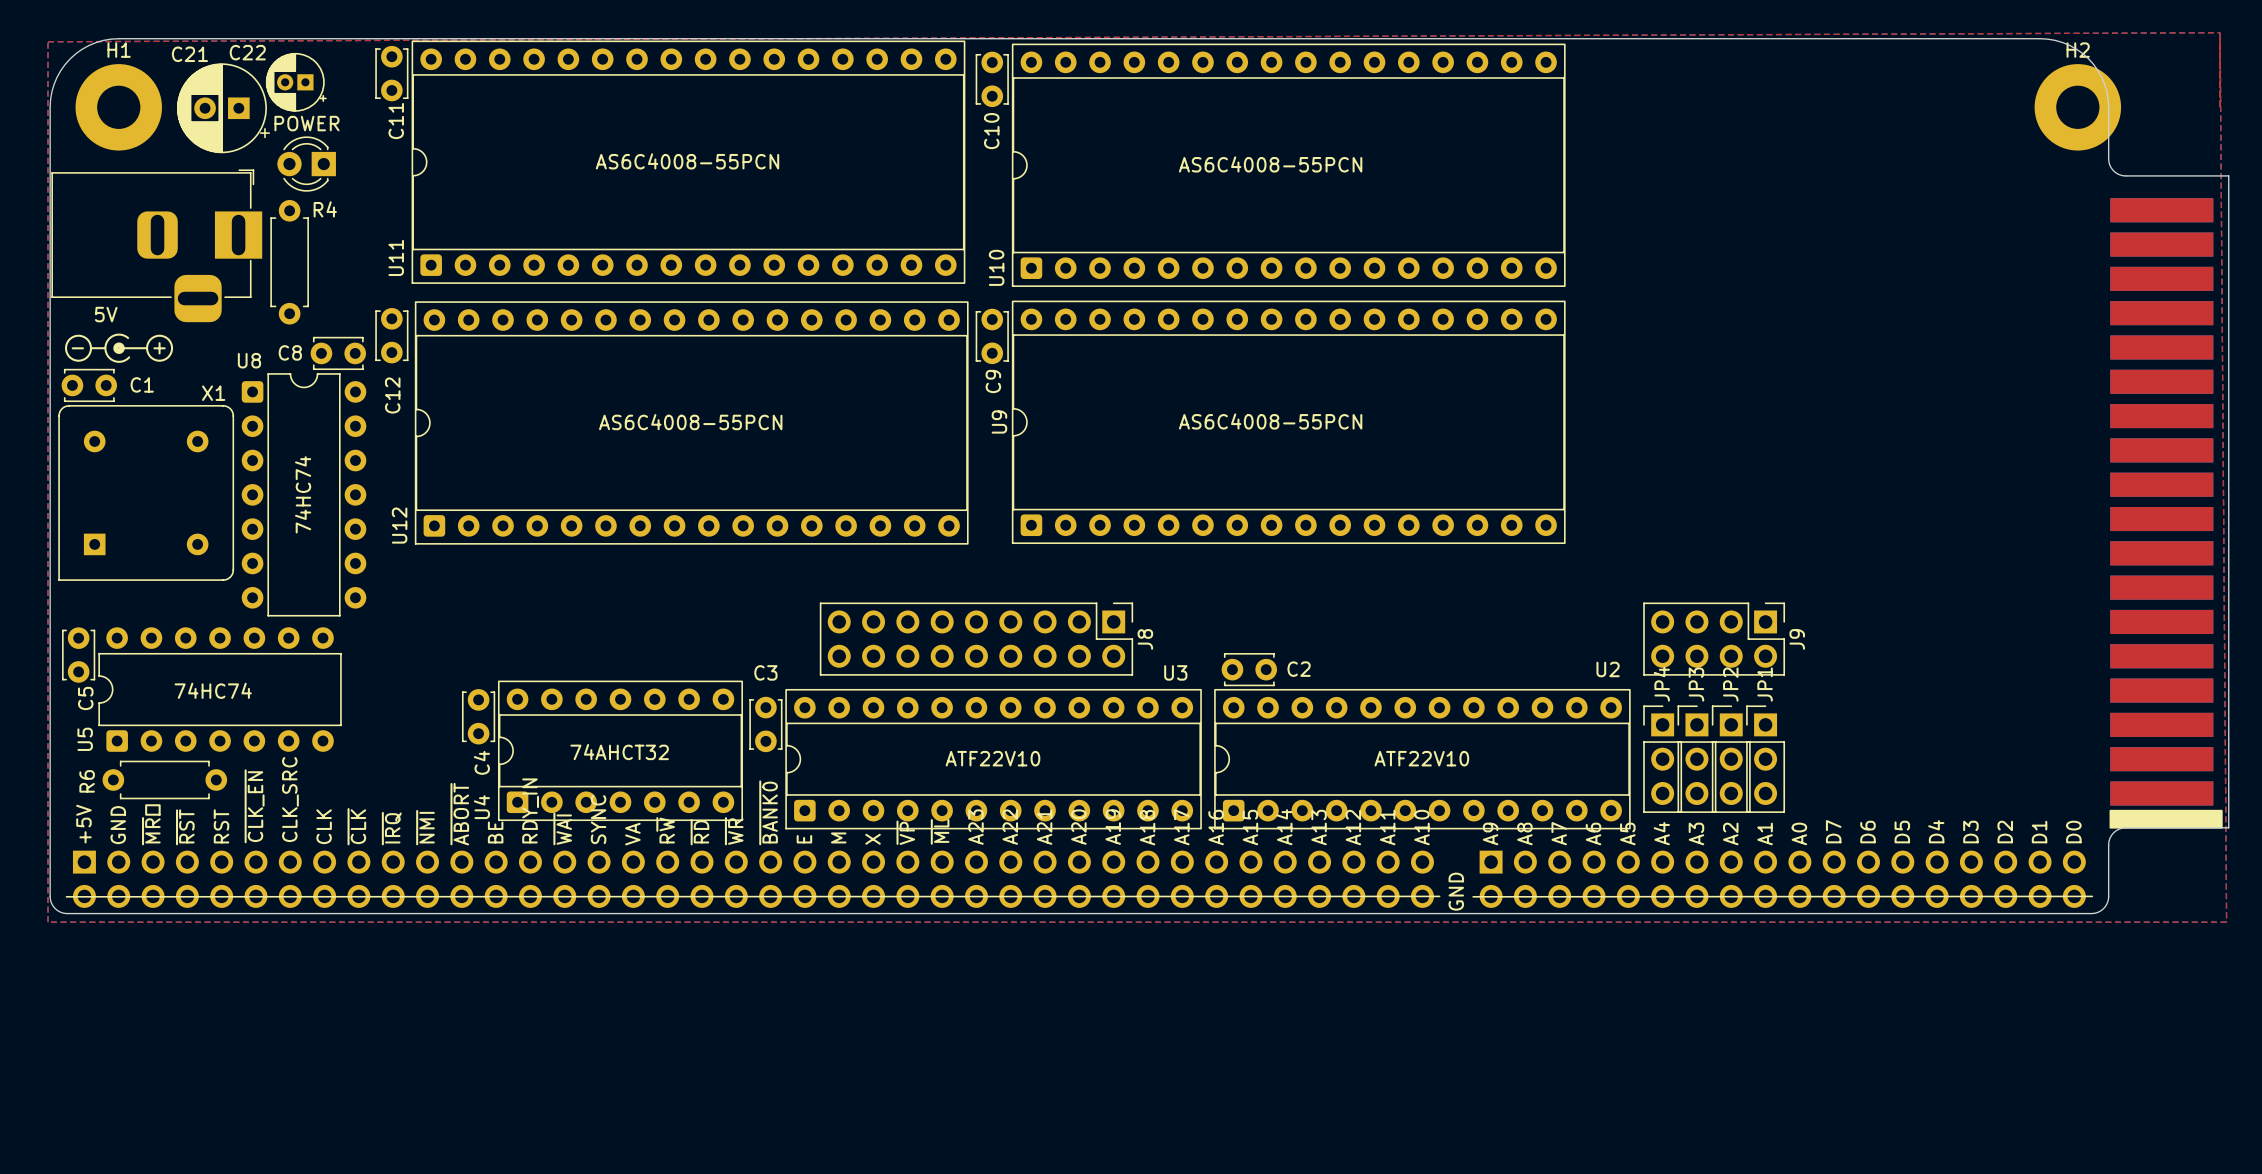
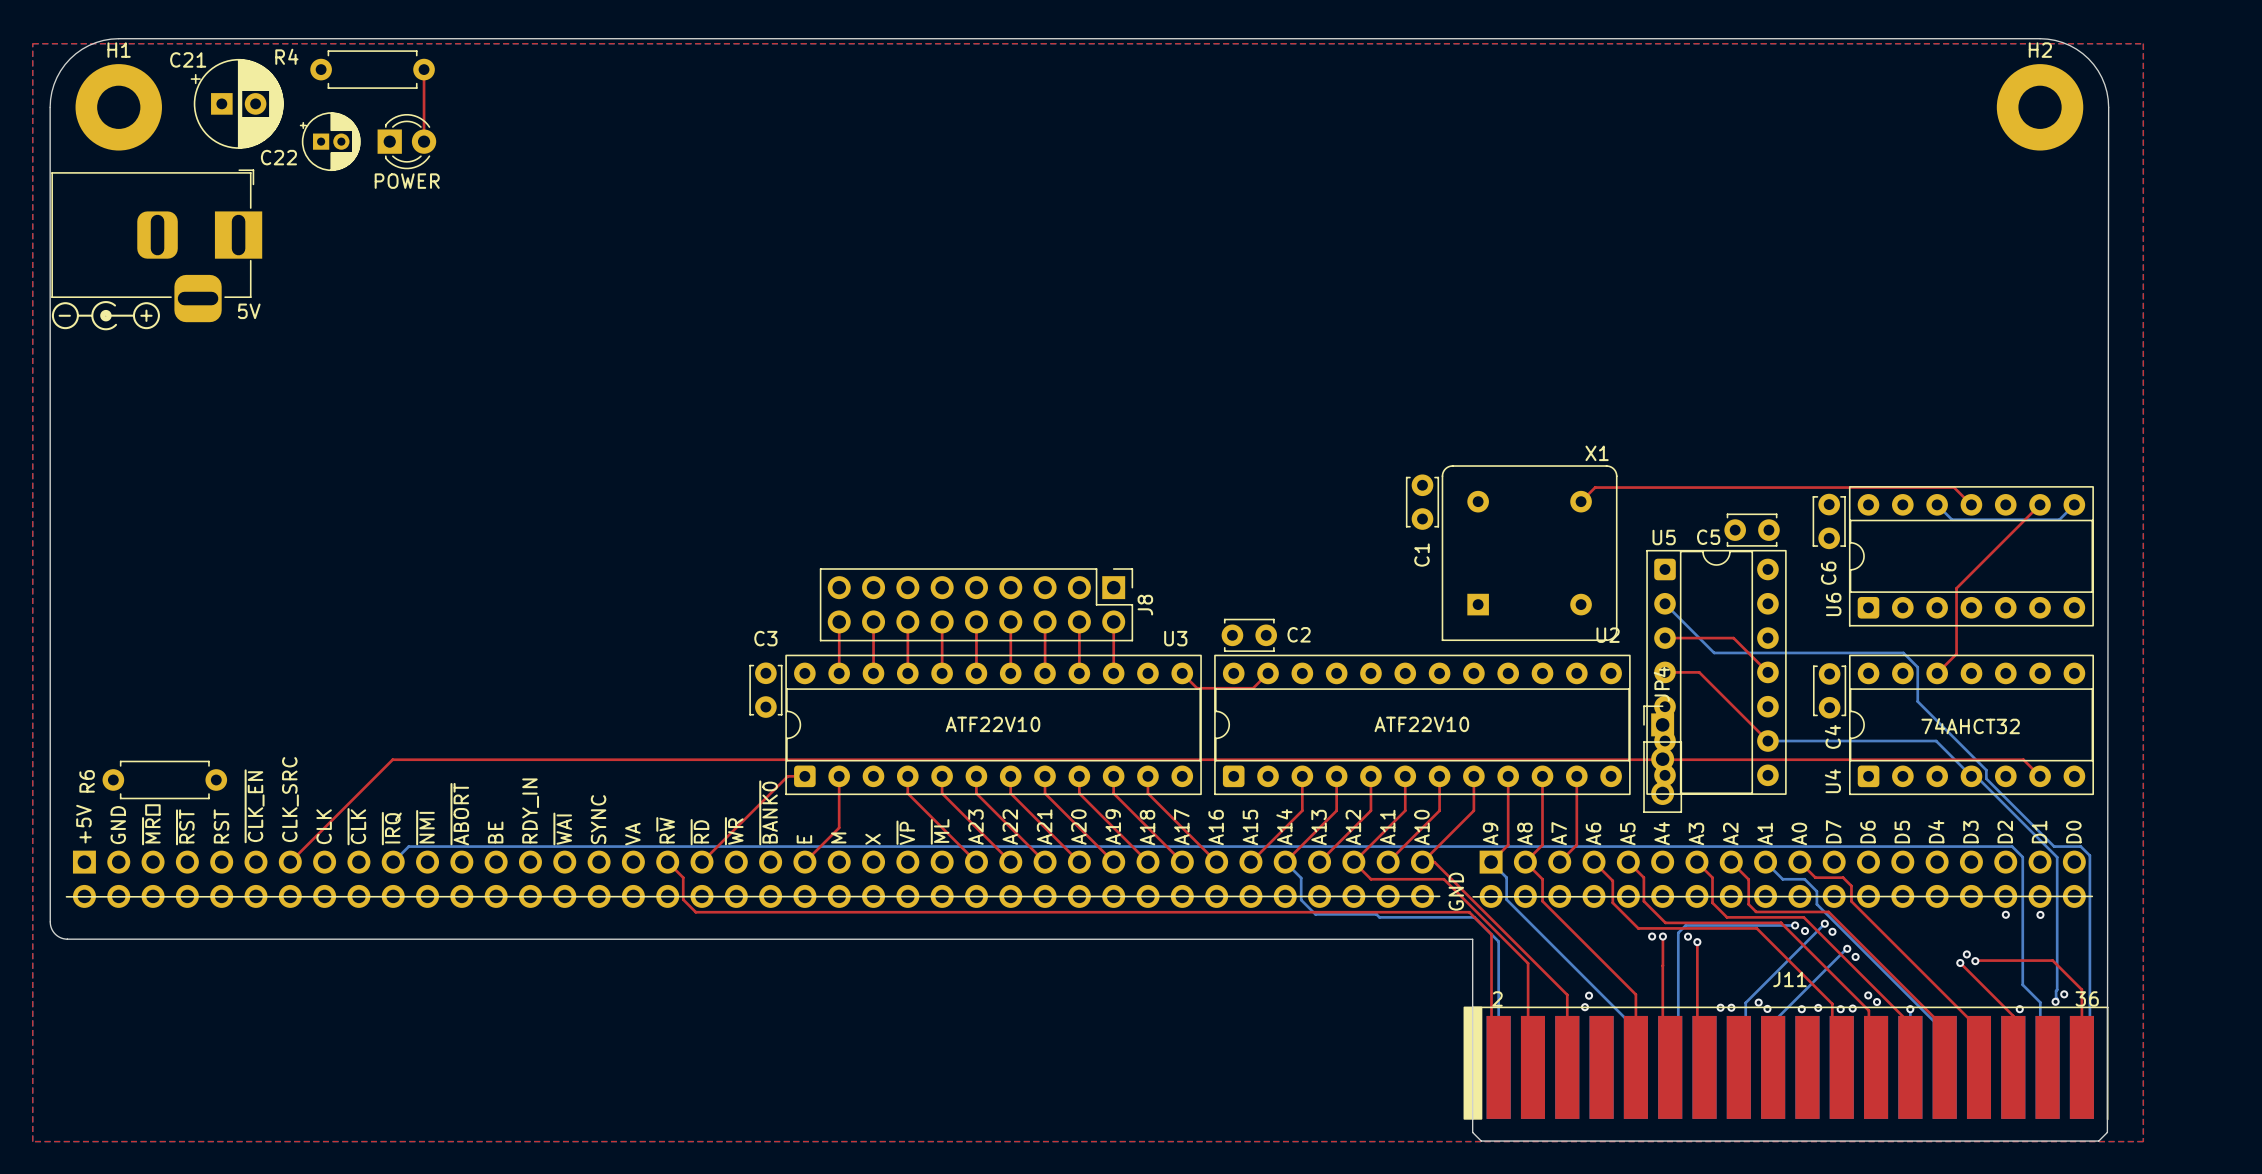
top zone outline: (2220, 32) (48, 41) (48, 922) (2226, 922) (2220, 32) -> (32, 43) (32, 1141) (2143, 1141) (2143, 43) (32, 43)
C22 name position: C22 (247, 52) -> C22 (278, 157)
top track: none -> (424, 69) (424, 141)
C11: (391, 73) -> none
C10: (992, 79) -> none
C22 rotation: 0° (296, 82) -> 180° (330, 141)
C22 position: (296, 82) -> (330, 141)
board edge: (50, 107) (50, 896) (55, 908) (67, 913) (2097, 912) (2103, 908) (2108, 900) (2108, 843) (2111, 835) (2116, 830) (2125, 827) (2228, 827) (2228, 175) (2125, 175) (2116, 173) (2111, 167) (2108, 160) (2108, 107) -> (50, 922) (55, 934) (67, 939) (1472, 939) (1472, 1132) (1481, 1141) (2098, 1141) (2107, 1132) (2108, 107)
board edge: none -> (50, 107) (50, 921)
H2 position: (2077, 107) -> (2040, 107)
C21 rotation: 0° (223, 108) -> 180° (237, 103)
U11: AS6C4008-55PCN (688, 162) -> none
part rotation: 0° (306, 164) -> 180° (406, 141)
part position: (306, 164) -> (406, 141)
U10: AS6C4008-55PCN (1288, 165) -> none
R4 name position: R4 (325, 209) -> R4 (286, 56)
R4 rotation: 0° (289, 262) -> 90° clockwise (372, 69)
R4 position: (289, 262) -> (372, 69)
text position: 5V (106, 314) -> 5V (249, 311)
C12: (391, 335) -> none
C9: (992, 336) -> none
text position: - (77, 348) -> - (64, 315)
drawing position: (119, 348) -> (105, 315)
text position: + (159, 348) -> + (146, 315)
C8: (338, 353) -> none
C1 rotation: 0° (89, 385) -> 90° clockwise (1422, 502)
C1 position: (89, 385) -> (1422, 502)
U12: AS6C4008-55PCN (691, 422) -> none
U9: AS6C4008-55PCN (1288, 422) -> none
X1 position: (146, 492) -> (1529, 553)
U8: 74HC74 (304, 494) -> none
top track: none -> (1581, 501) (1595, 487) (1954, 487) (1971, 504)
bottom track: none -> (1937, 504) (1951, 519) (2059, 519) (2074, 504)
top track: none -> (2040, 504) (1956, 588) (1956, 654) (1937, 673)
part: (2166, 513) -> none
C6: none -> (1829, 521)
U6: none -> (1971, 556)
bottom track: none -> (1665, 603) (1714, 652) (1903, 652) (1917, 667) (1917, 701) (1986, 770) (1986, 778) (2054, 846) (2080, 846) (2089, 855) (2089, 1059) (2081, 1067)
top track: none -> (839, 621) (839, 673)
top track: none -> (873, 621) (873, 673)
top track: none -> (907, 621) (907, 673)
top track: none -> (942, 621) (942, 673)
top track: none -> (976, 621) (976, 673)
top track: none -> (1010, 621) (1010, 673)
top track: none -> (1045, 621) (1045, 673)
top track: none -> (1079, 621) (1079, 673)
top track: none -> (1113, 621) (1113, 673)
U5 footprint: [98, 627, 342, 752] -> [1646, 549, 1787, 795]
top track: none -> (1665, 638) (1733, 638) (1767, 672)
J8 position: (976, 639) -> (976, 604)
J9: (1714, 639) -> none
C5 rotation: 0° (78, 655) -> 90° clockwise (1752, 530)
C5 position: (78, 655) -> (1752, 530)
C2 position: (1249, 669) -> (1249, 635)
top track: none -> (1665, 672) (1699, 672) (1767, 741)
top track: none -> (1182, 673) (1197, 688) (1253, 688) (1268, 673)
U5 value: 74HC74 (213, 690) -> none
C4 position: (478, 716) -> (1829, 690)
C3 position: (765, 724) -> (765, 690)
U5 name position: U5 (85, 739) -> U5 (1664, 537)
bottom track: none -> (1767, 741) (1936, 741) (1971, 776) (1976, 776) (2057, 857) (2057, 1000) (2055, 1001)
U4 position: (620, 750) -> (1971, 724)
U3 position: (993, 759) -> (993, 724)
U2 position: (1422, 759) -> (1422, 724)
JP3: (1696, 759) -> none
JP2: (1731, 759) -> none
JP1: (1765, 759) -> none
top track: none -> (804, 776) (787, 776) (702, 862)
top track: none -> (839, 776) (839, 827) (804, 862)
top track: none -> (907, 776) (907, 793) (976, 862)
top track: none -> (942, 776) (942, 793) (1010, 862)
top track: none -> (976, 776) (976, 793) (1045, 862)
top track: none -> (1010, 776) (1010, 793) (1079, 862)
top track: none -> (1045, 776) (1045, 793) (1113, 862)
top track: none -> (1079, 776) (1079, 793) (1148, 862)
top track: none -> (1113, 776) (1113, 793) (1182, 862)
top track: none -> (1147, 776) (1147, 793) (1216, 862)
top track: none -> (1302, 776) (1302, 810) (1250, 862)
top track: none -> (1336, 776) (1336, 810) (1285, 862)
top track: none -> (1370, 776) (1370, 810) (1319, 862)
top track: none -> (1405, 776) (1405, 810) (1353, 862) (1371, 879) (1444, 879) (1528, 963) (1528, 1062) (1532, 1067)
top track: none -> (1439, 776) (1439, 810) (1388, 862)
top track: none -> (1473, 776) (1473, 810) (1422, 862) (1434, 862) (1567, 994) (1567, 1067)
top track: none -> (1508, 776) (1508, 845) (1491, 862)
top track: none -> (1542, 776) (1542, 845) (1525, 862) (1542, 879) (1542, 901) (1635, 994) (1635, 1067)
top track: none -> (1576, 776) (1576, 845) (1559, 862)
top track: none -> (2040, 776) (2023, 759) (392, 759) (290, 862)
bottom track: none -> (393, 862) (408, 846) (2012, 846) (2022, 857) (2022, 984) (2040, 1002) (2040, 1060) (2047, 1067)
top track: none -> (667, 862) (683, 877) (683, 899) (695, 912) (1469, 912) (1491, 934) (1491, 1060) (1498, 1067)
bottom track: none -> (1285, 862) (1301, 878) (1301, 900) (1315, 914) (1376, 914) (1379, 917) (1474, 917) (1498, 941) (1498, 1067)
bottom track: none -> (1491, 862) (1506, 877) (1506, 899) (1635, 1028) (1635, 1067)
top track: none -> (1594, 862) (1612, 880) (1612, 902) (1638, 928) (1756, 928) (1832, 1003) (1832, 1057) (1841, 1067)
top track: none -> (1628, 862) (1643, 877) (1643, 901) (1665, 922) (1781, 922) (1868, 1010) (1868, 1060) (1876, 1067)
top track: none -> (1696, 862) (1712, 877) (1712, 902) (1727, 917) (1803, 917) (1910, 1023) (1910, 1067)
top track: none -> (1731, 862) (1748, 879) (1748, 904) (1755, 911)
bottom track: none -> (1765, 862) (1782, 879) (1804, 879) (1816, 891) (1816, 904) (1944, 1032) (1944, 1067)
top track: none -> (1799, 862) (1815, 877) (1843, 877) (1851, 886) (1851, 901) (1978, 1028) (1978, 1067)
top track: none -> (1755, 911) (1828, 911) (1944, 1027) (1944, 1067)
via: none -> (2005, 914)
via: none -> (2040, 914)
bottom track: none -> (1824, 923) (1745, 1002) (1745, 1060) (1738, 1067)
via: none -> (1824, 923)
bottom track: none -> (1795, 925) (1685, 925) (1678, 932) (1678, 1059) (1670, 1067)
via: none -> (1795, 925)
via: none -> (1805, 930)
via: none -> (1832, 931)
via: none -> (1652, 936)
top track: none -> (1662, 936) (1662, 965)
via: none -> (1662, 936)
via: none -> (1688, 936)
top track: none -> (1697, 942) (1697, 1060) (1704, 1067)
via: none -> (1697, 942)
via: none -> (1847, 948)
bottom track: none -> (1846, 949) (1773, 1022) (1773, 1067)
via: none -> (1966, 954)
via: none -> (1855, 956)
top track: none -> (1975, 961) (2052, 960) (2081, 989) (2081, 1067)
via: none -> (1975, 961)
top track: none -> (1960, 962) (2013, 1016) (2013, 1067)
via: none -> (1960, 962)
top track: none -> (1662, 965) (1662, 1059) (1670, 1067)
via: none -> (2064, 994)
via: none -> (1589, 995)
via: none -> (1868, 995)
via: none -> (2055, 1001)
via: none -> (1758, 1002)
via: none -> (1877, 1002)
via: none -> (1584, 1007)
via: none -> (1720, 1007)
via: none -> (1731, 1007)
via: none -> (1818, 1007)
via: none -> (1767, 1008)
via: none -> (1852, 1008)
via: none -> (1801, 1009)
via: none -> (1840, 1009)
via: none -> (1910, 1009)
via: none -> (2019, 1009)
J11: none -> (1786, 1063)

